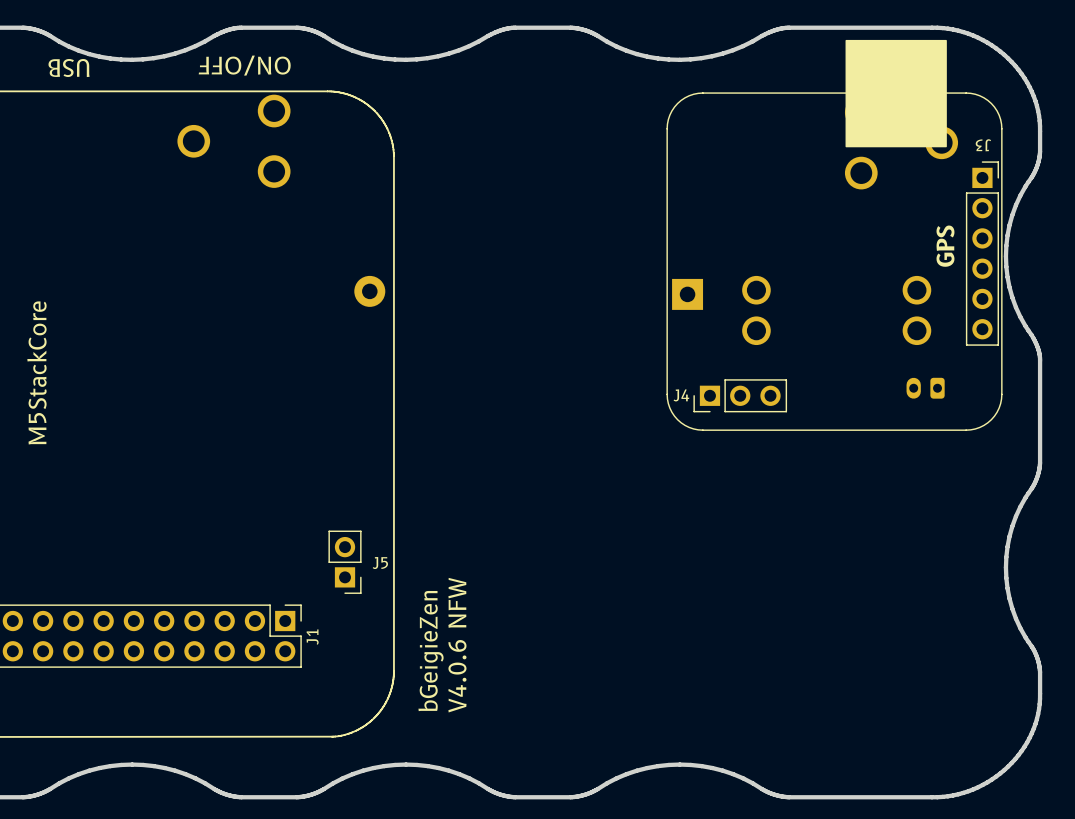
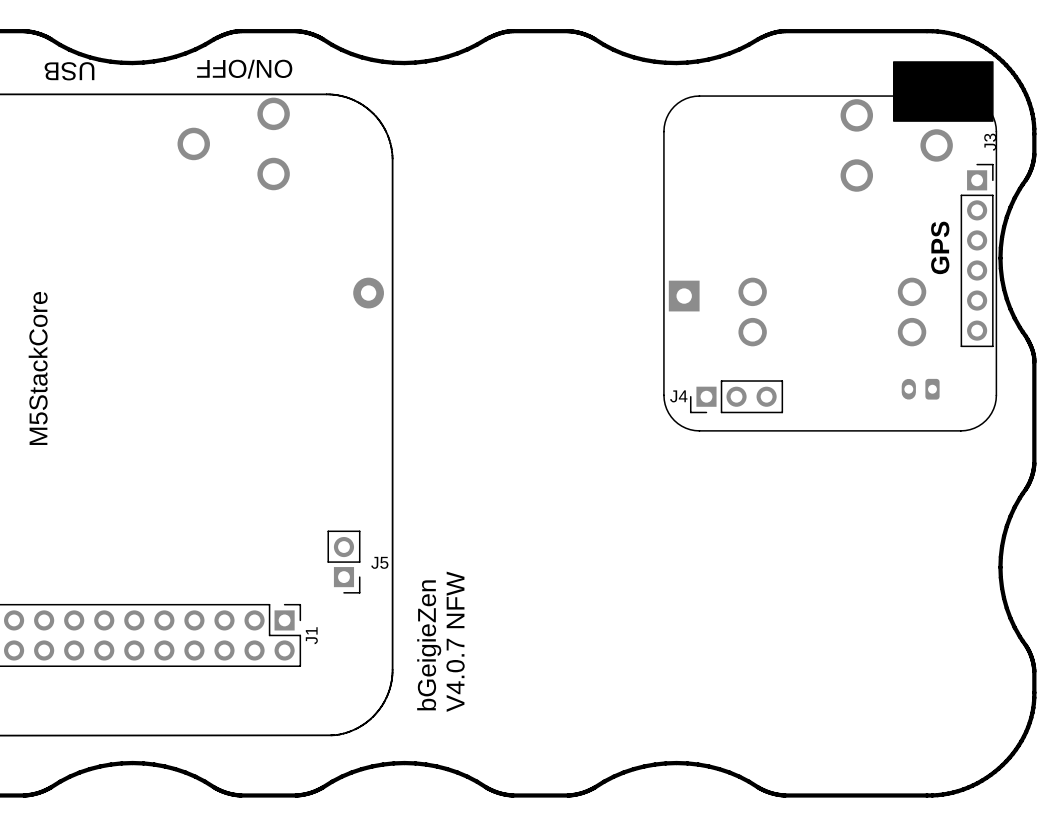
drawing: [845, 39, 947, 148] -> none
drawing: none -> [893, 61, 994, 122]
J3 name rotation: 0° (983, 145) -> 90° clockwise (990, 142)
text: V4.0.6 NFW (457, 645) -> V4.0.7 NFW (455, 641)

